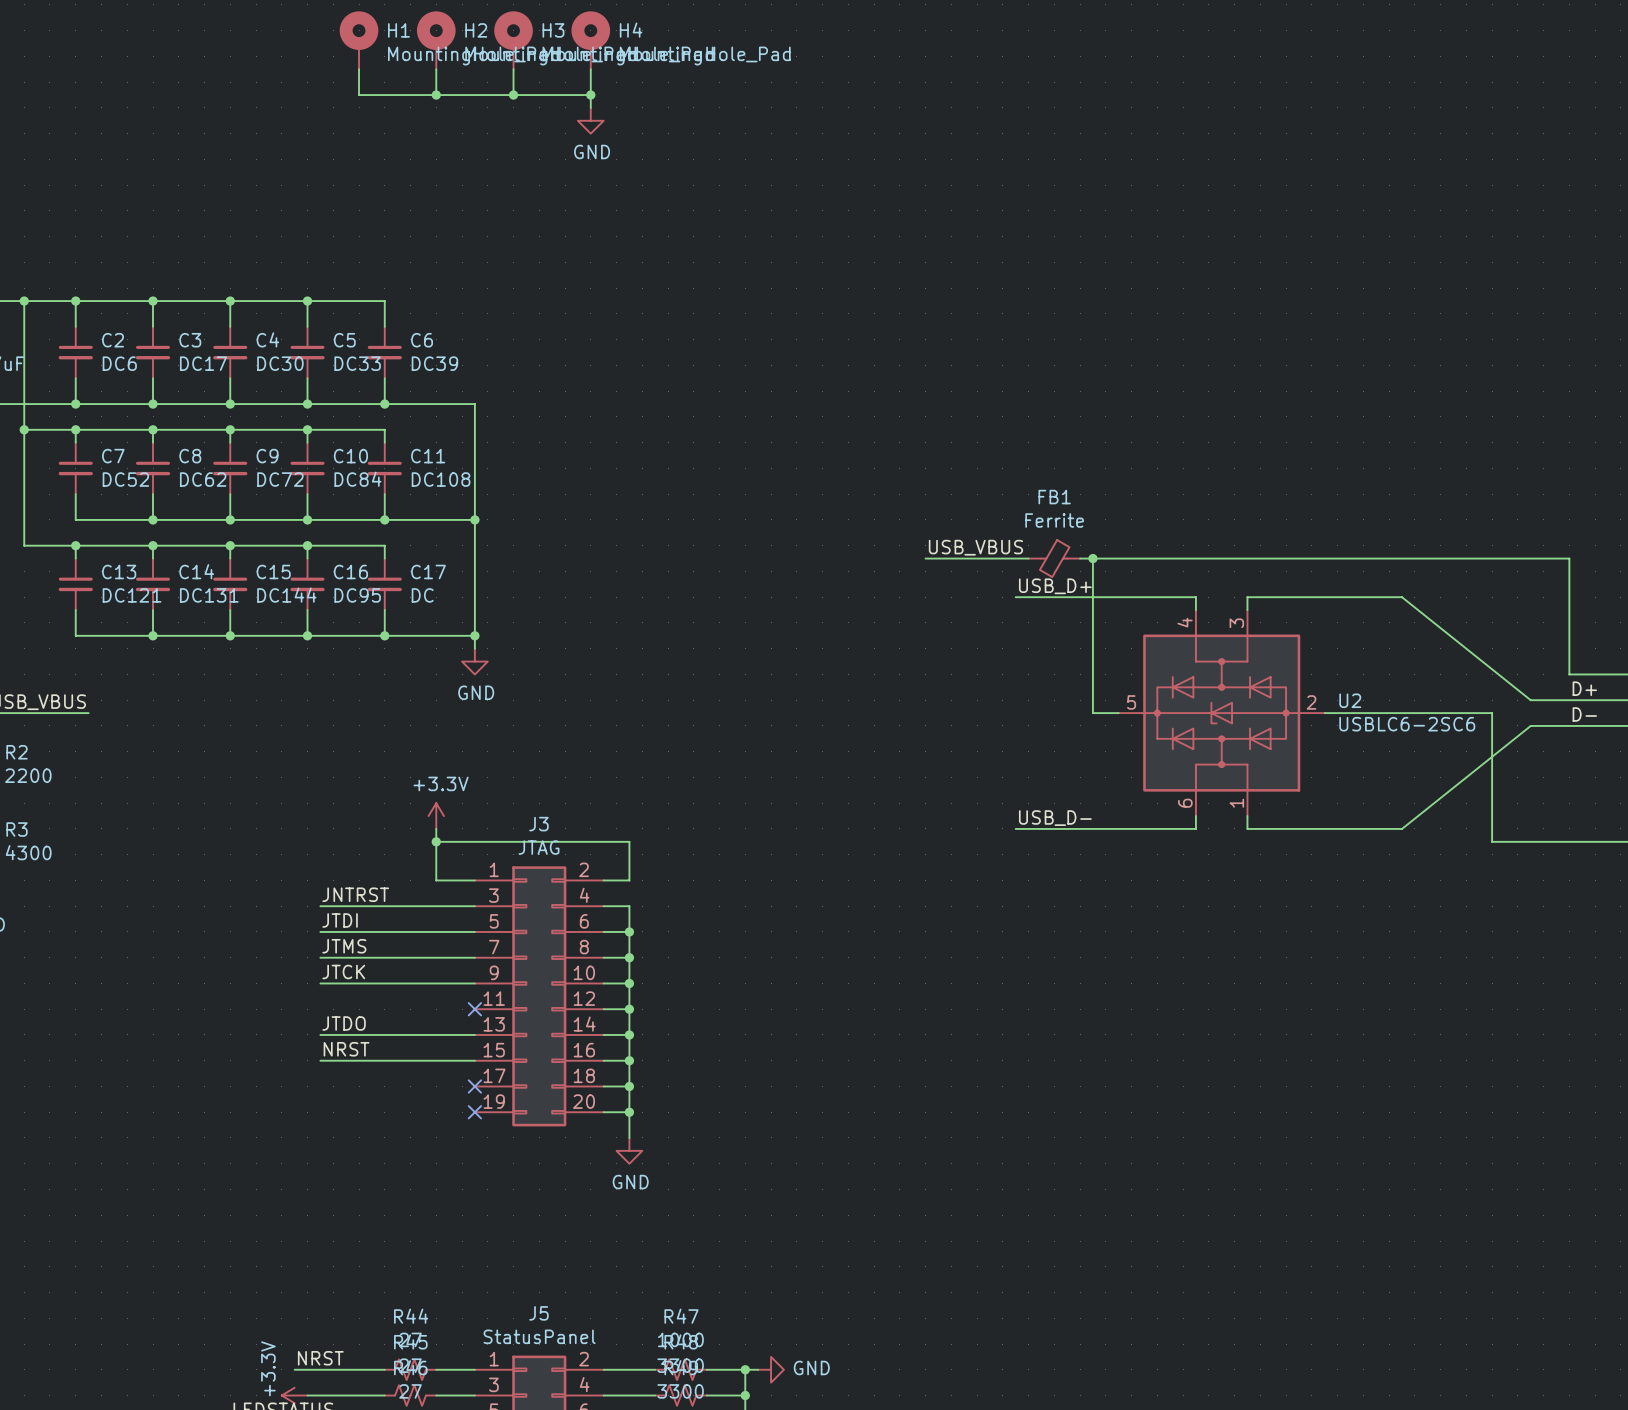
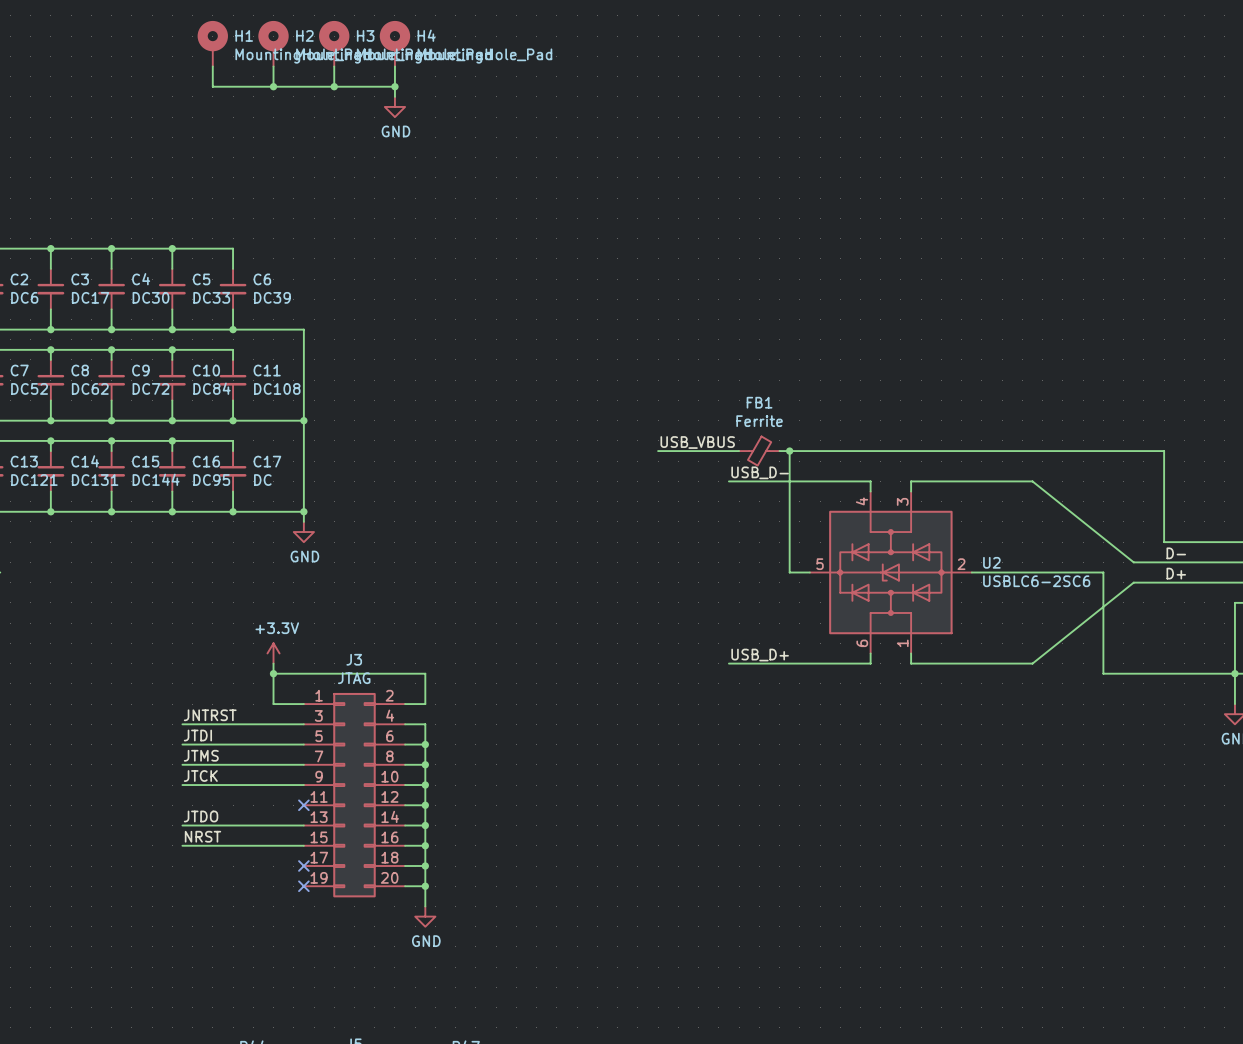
label: USB_D+ (1055, 586) -> USB_D- (760, 472)
label: D+ (1584, 688) -> D- (1176, 553)
label: D- (1584, 714) -> D+ (1176, 573)
label: USB_D- (1055, 818) -> USB_D+ (760, 655)

